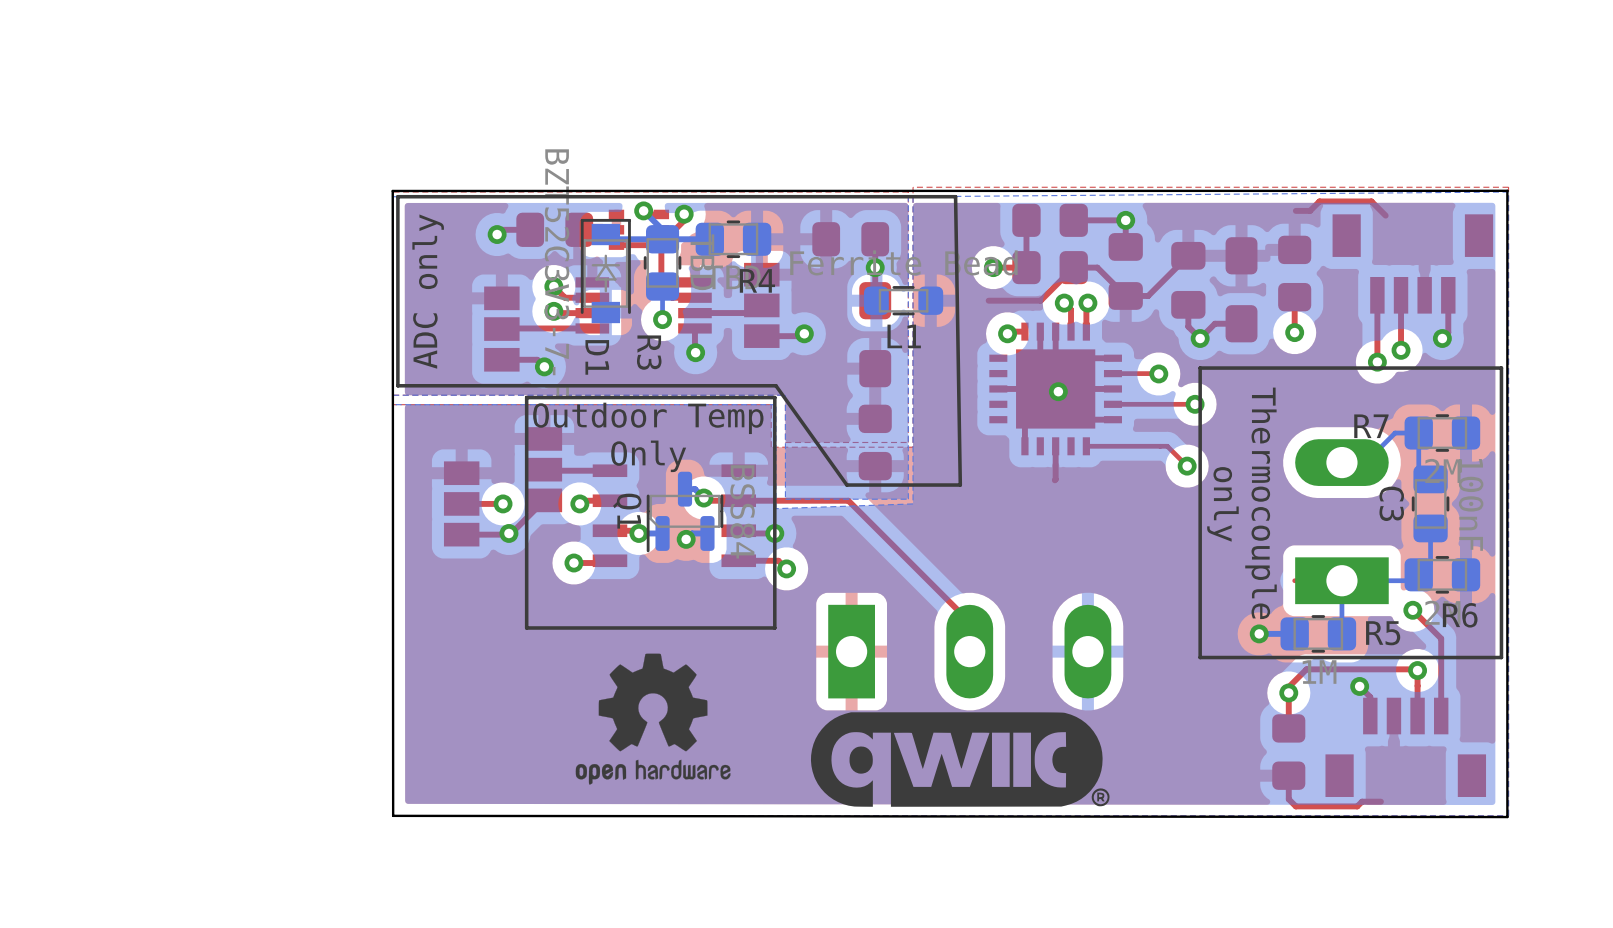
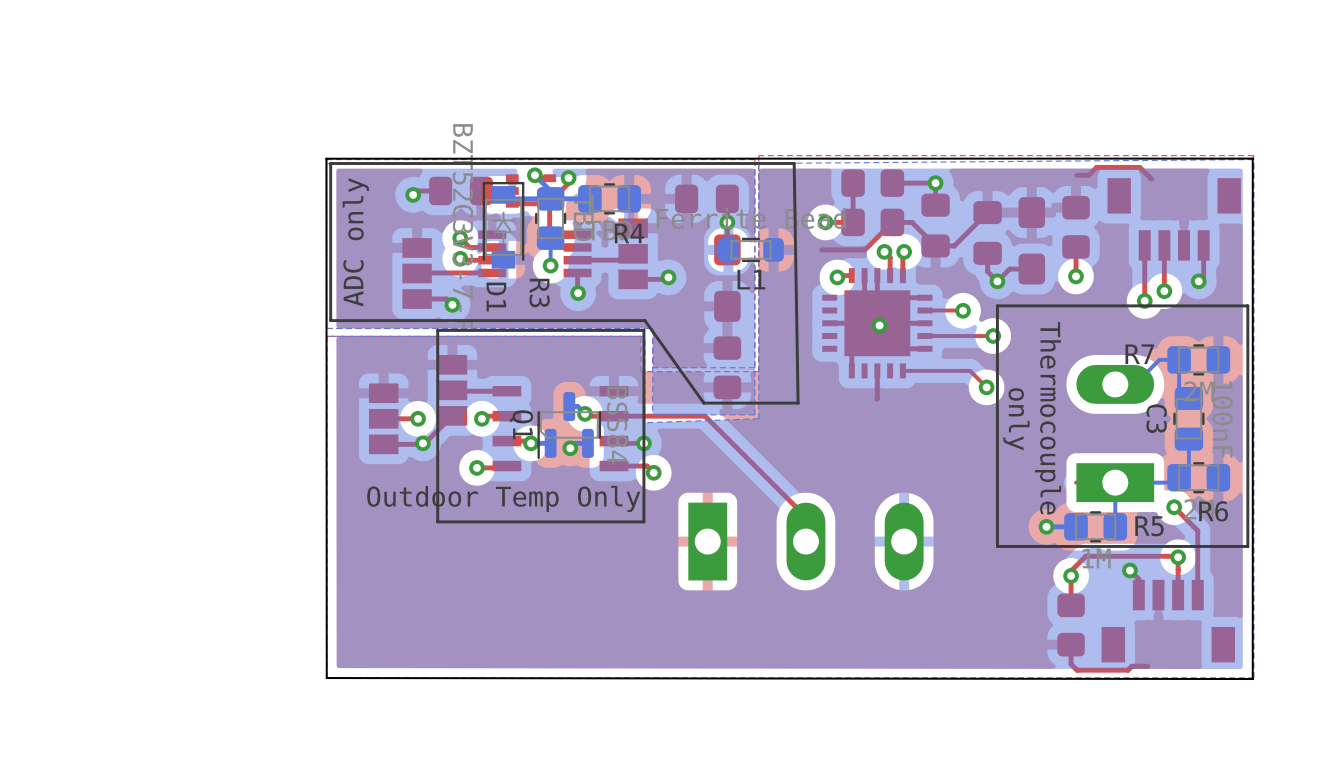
text: Outdoor Temp (648, 418) -> none
text: Only (648, 456) -> none
text: none -> Outdoor Temp Only (503, 498)
drawing: [575, 653, 731, 785] -> none
drawing: [810, 712, 1110, 807] -> none

